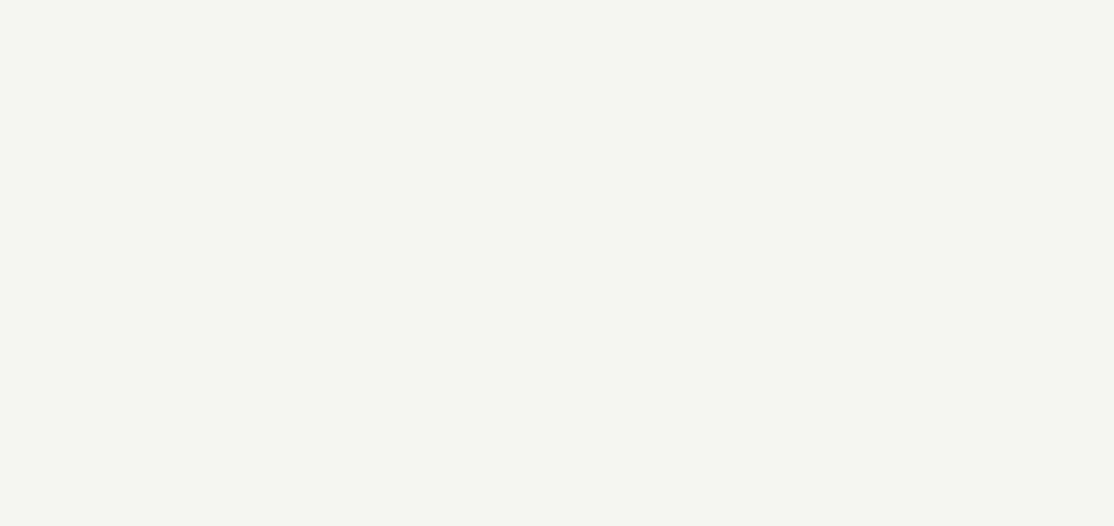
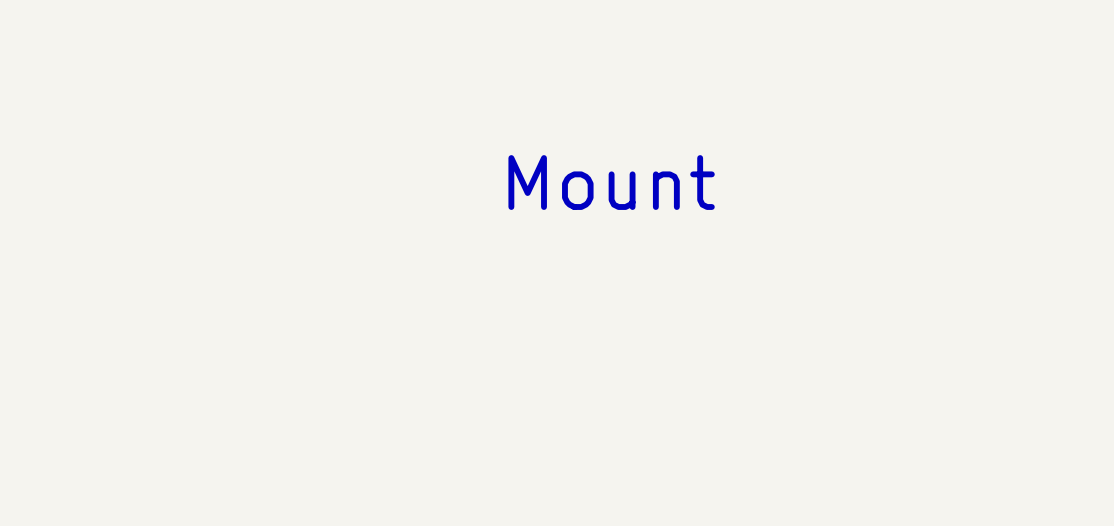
text: none -> Mount (611, 182)

